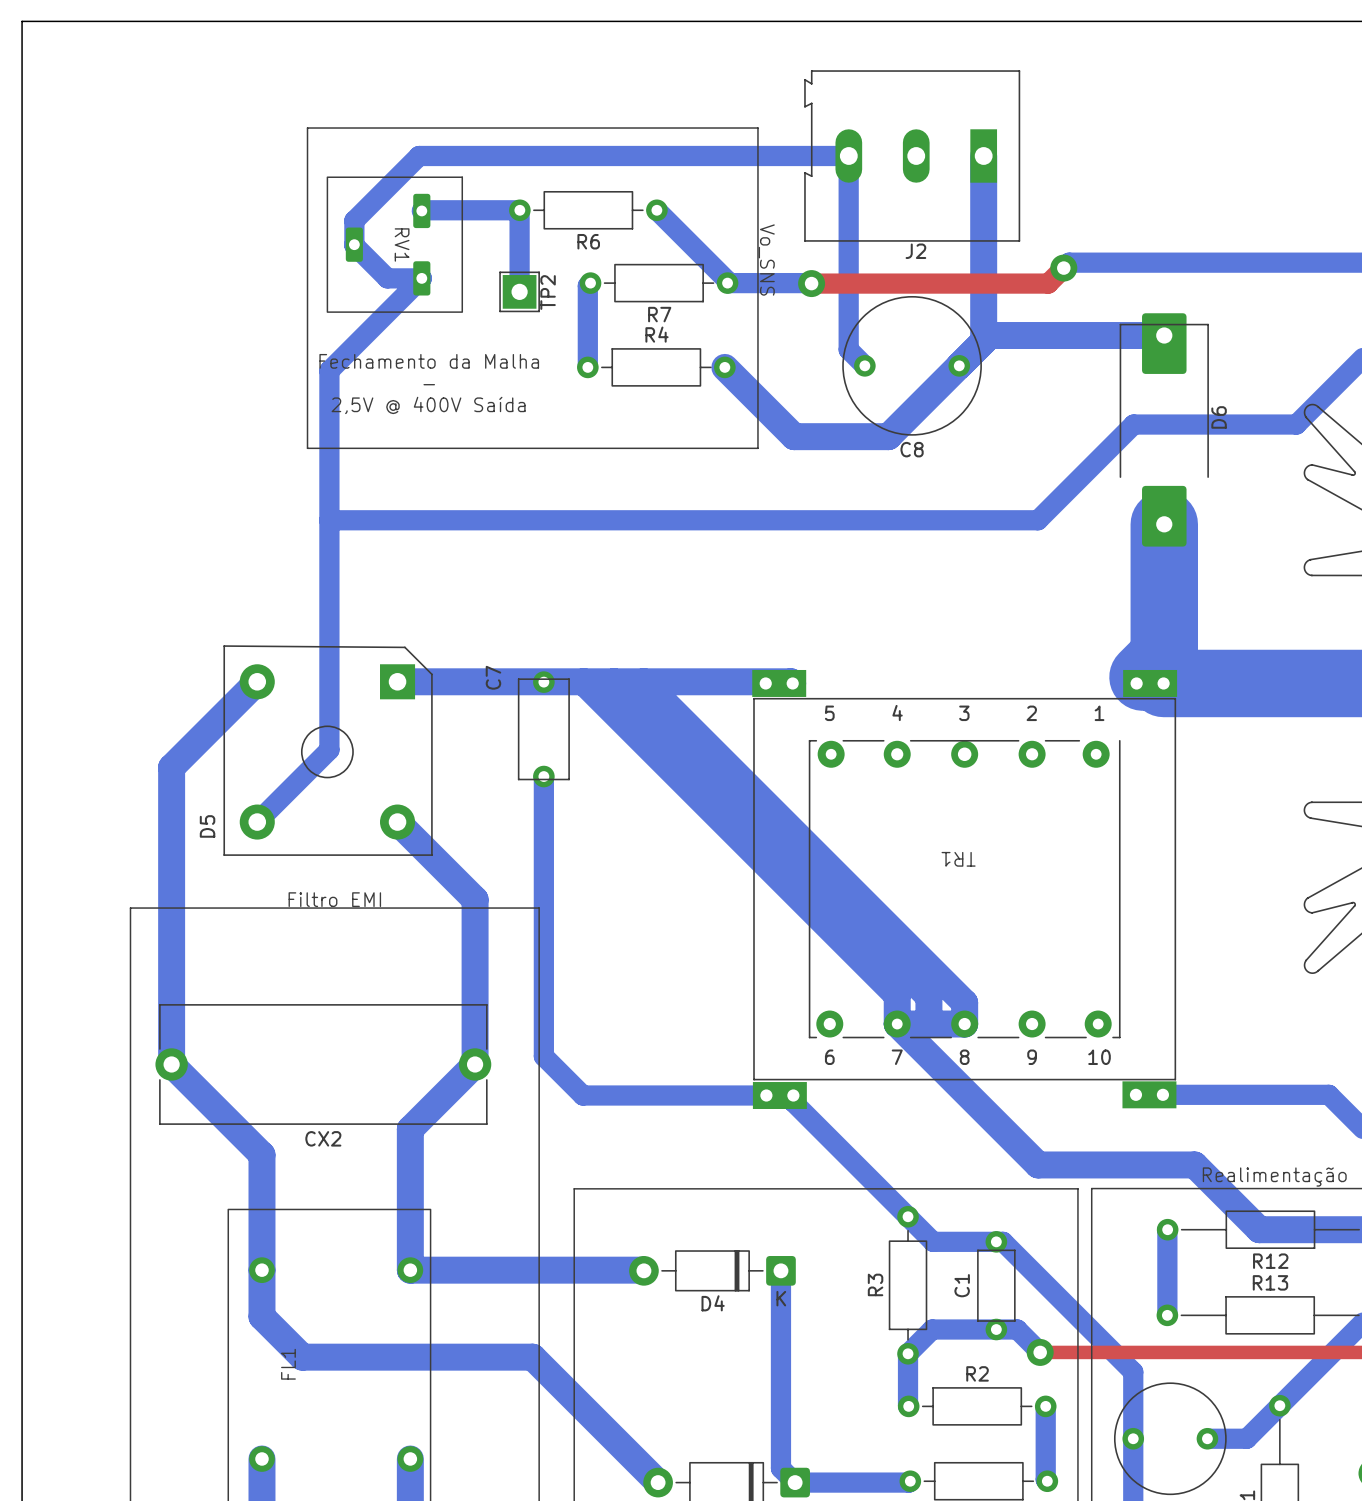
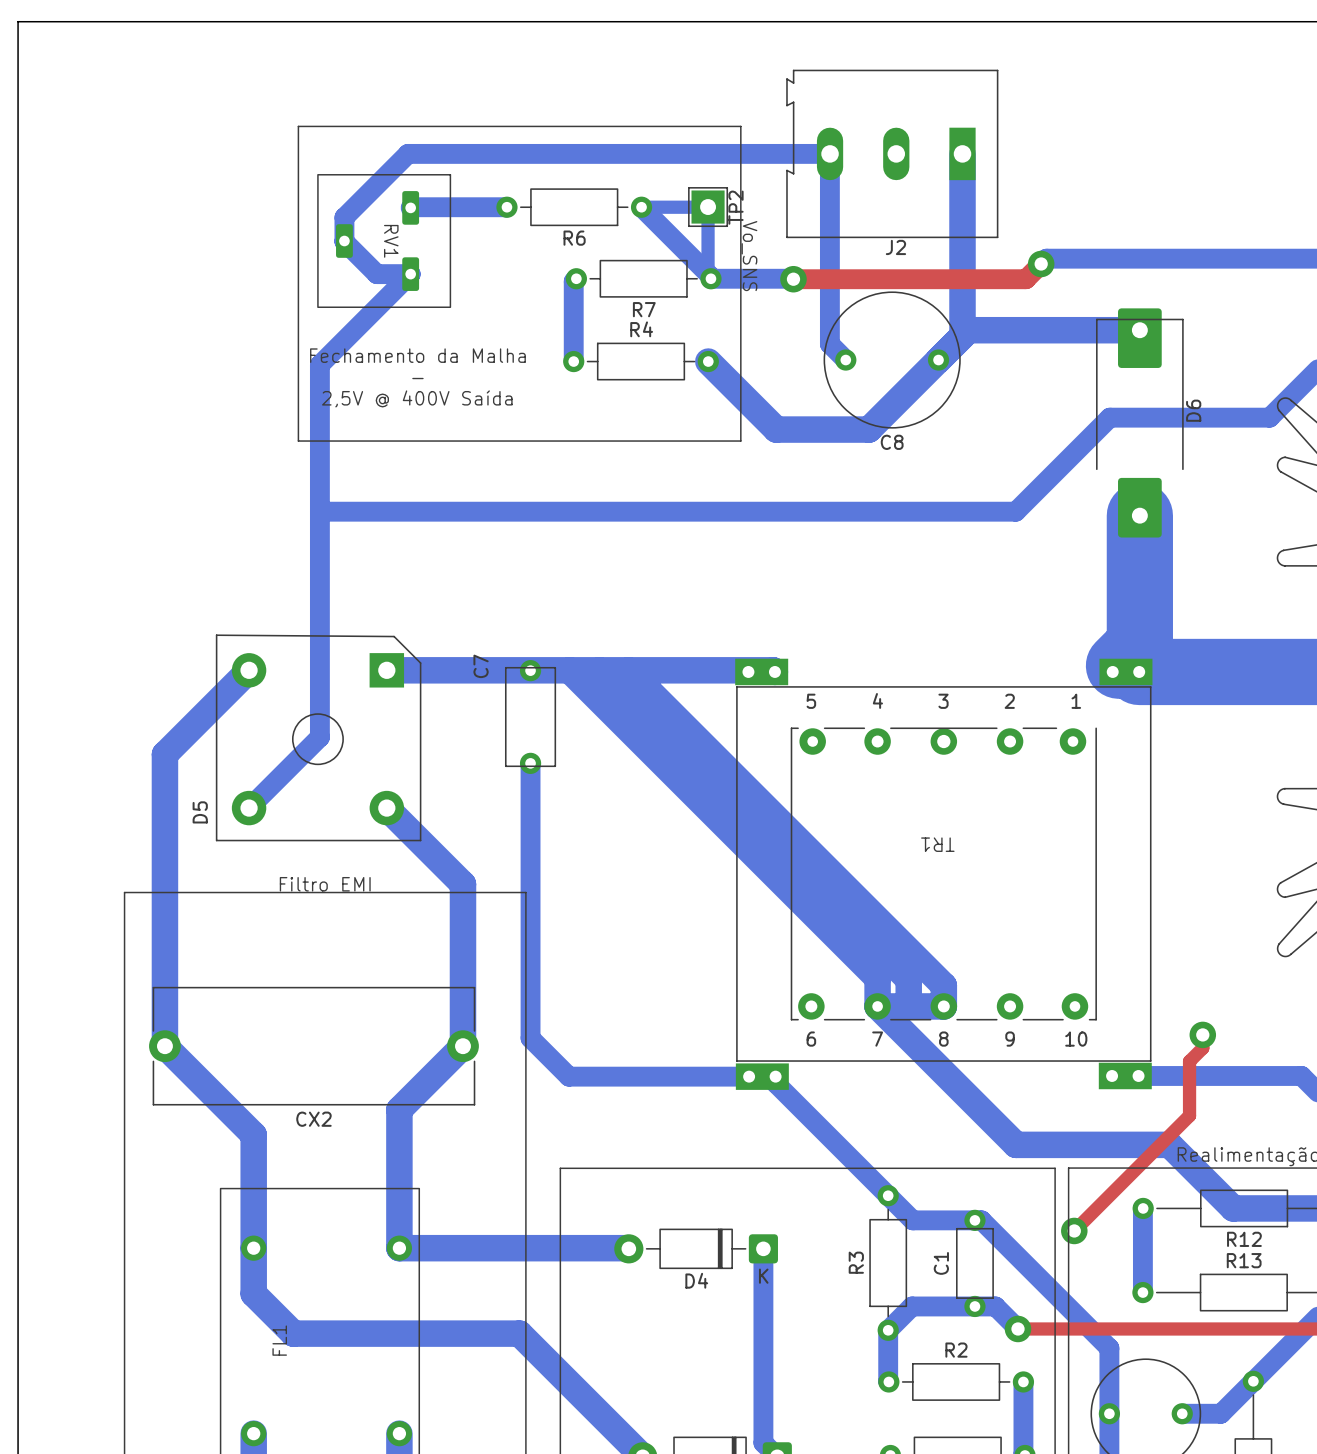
bottom track: (519, 210) (519, 291) -> none
bottom track: none -> (641, 207) (708, 207) (708, 275) (710, 278)
TP2 position: (519, 291) -> (708, 207)
top track: none -> (1202, 1034) (1202, 1048) (1189, 1061) (1189, 1115) (1074, 1230)
via: none -> (1202, 1034)
via: none -> (1074, 1230)

